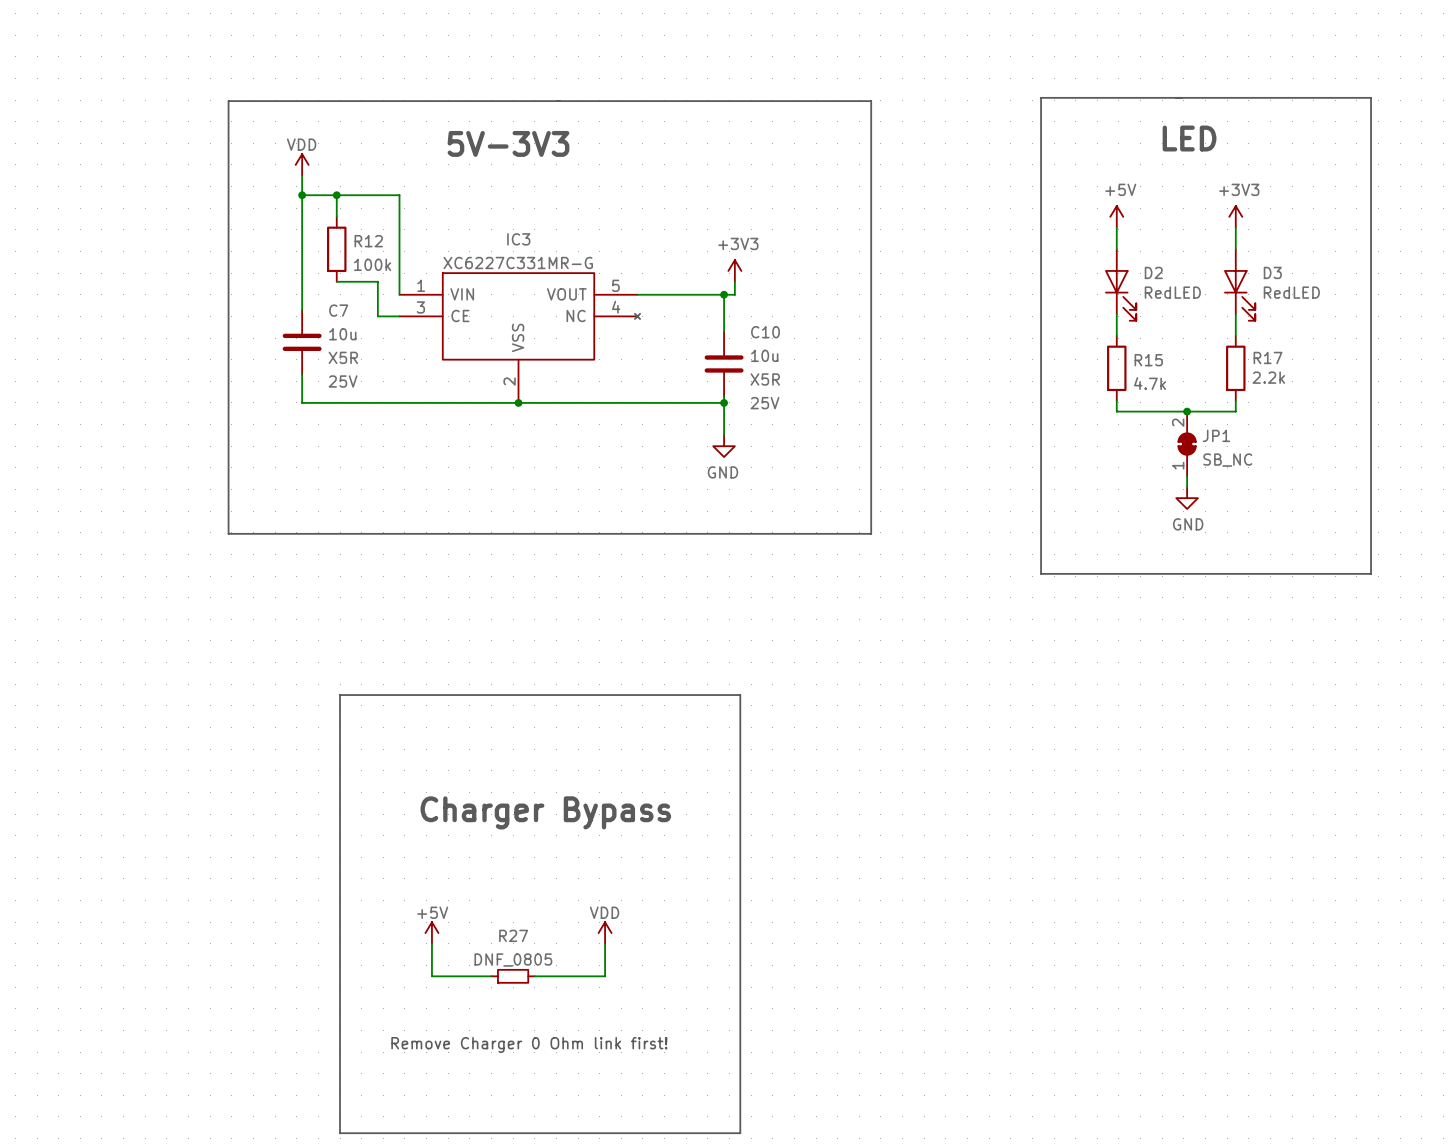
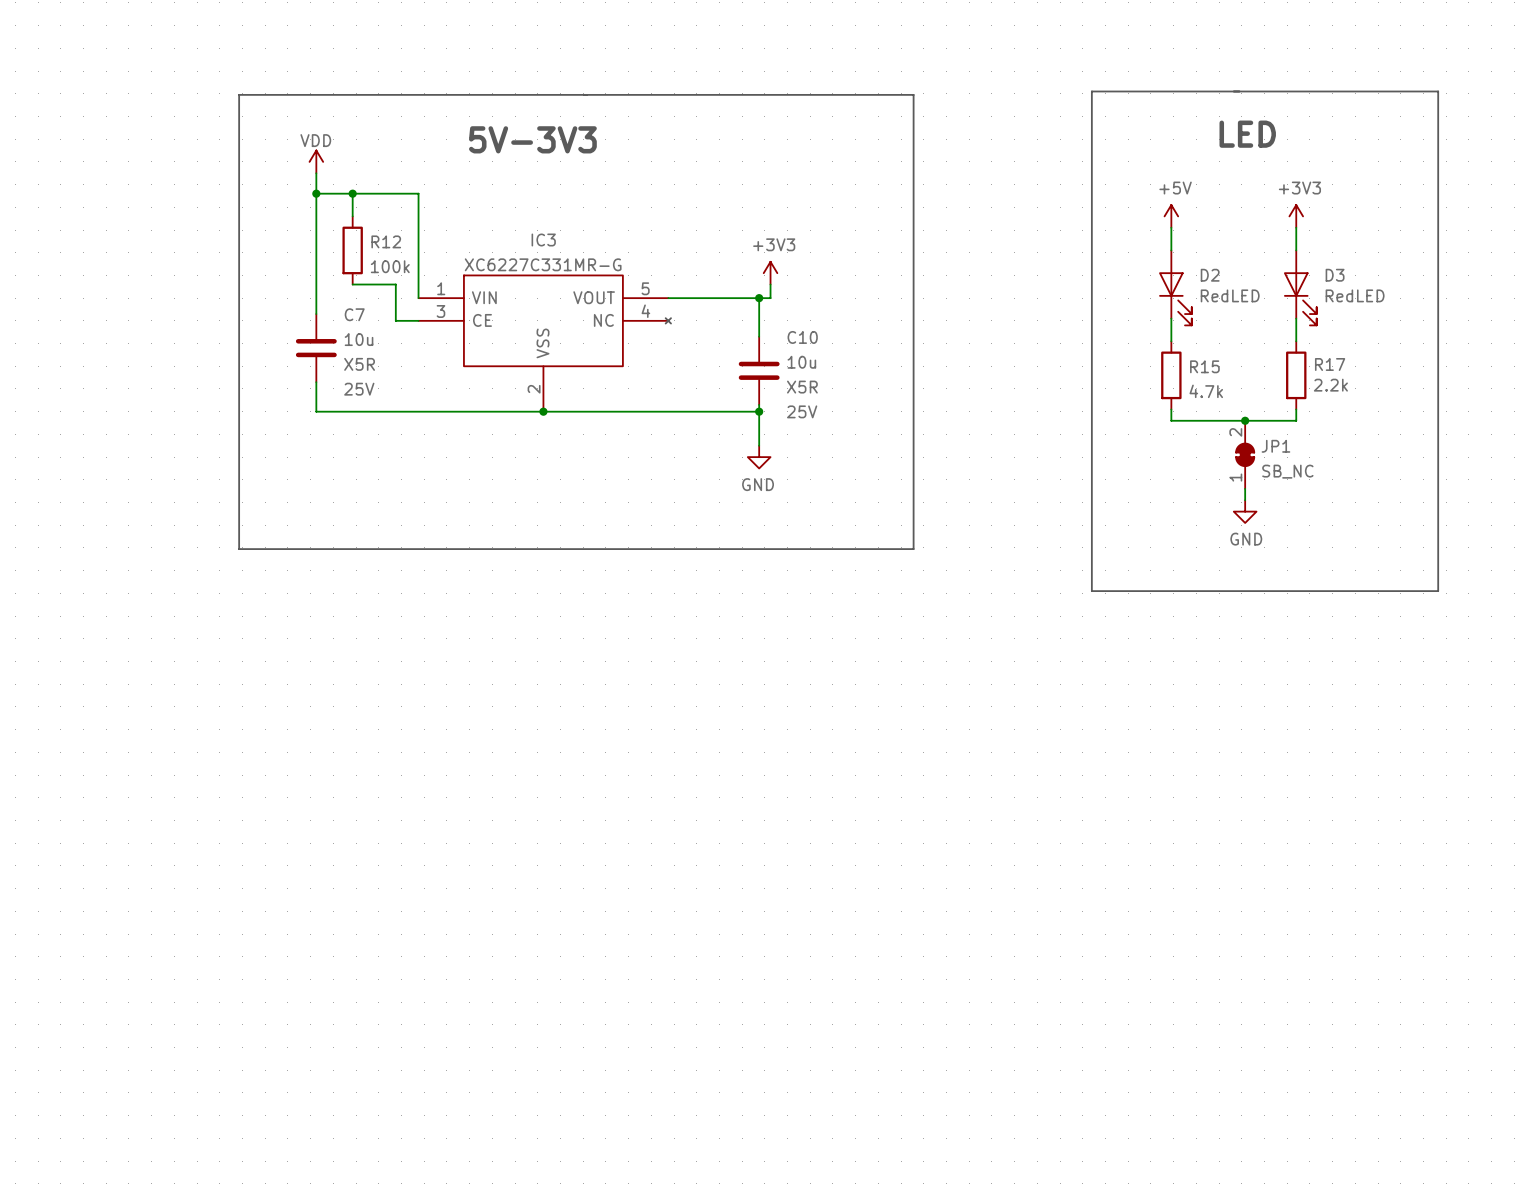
line: (340, 695) (340, 1133) (740, 1133) (740, 695) (340, 695) -> none
text: Charger Bypass (545, 812) -> none
power symbol: +5V (431, 933) -> none
power symbol: VDD (605, 933) -> none
wire: (431, 943) (431, 976) (491, 976) -> none
wire: (605, 943) (605, 976) (534, 976) -> none
R27: DNF_0805 (513, 976) -> none
text: Remove Charger 0 Ohm link first! (529, 1045) -> none

